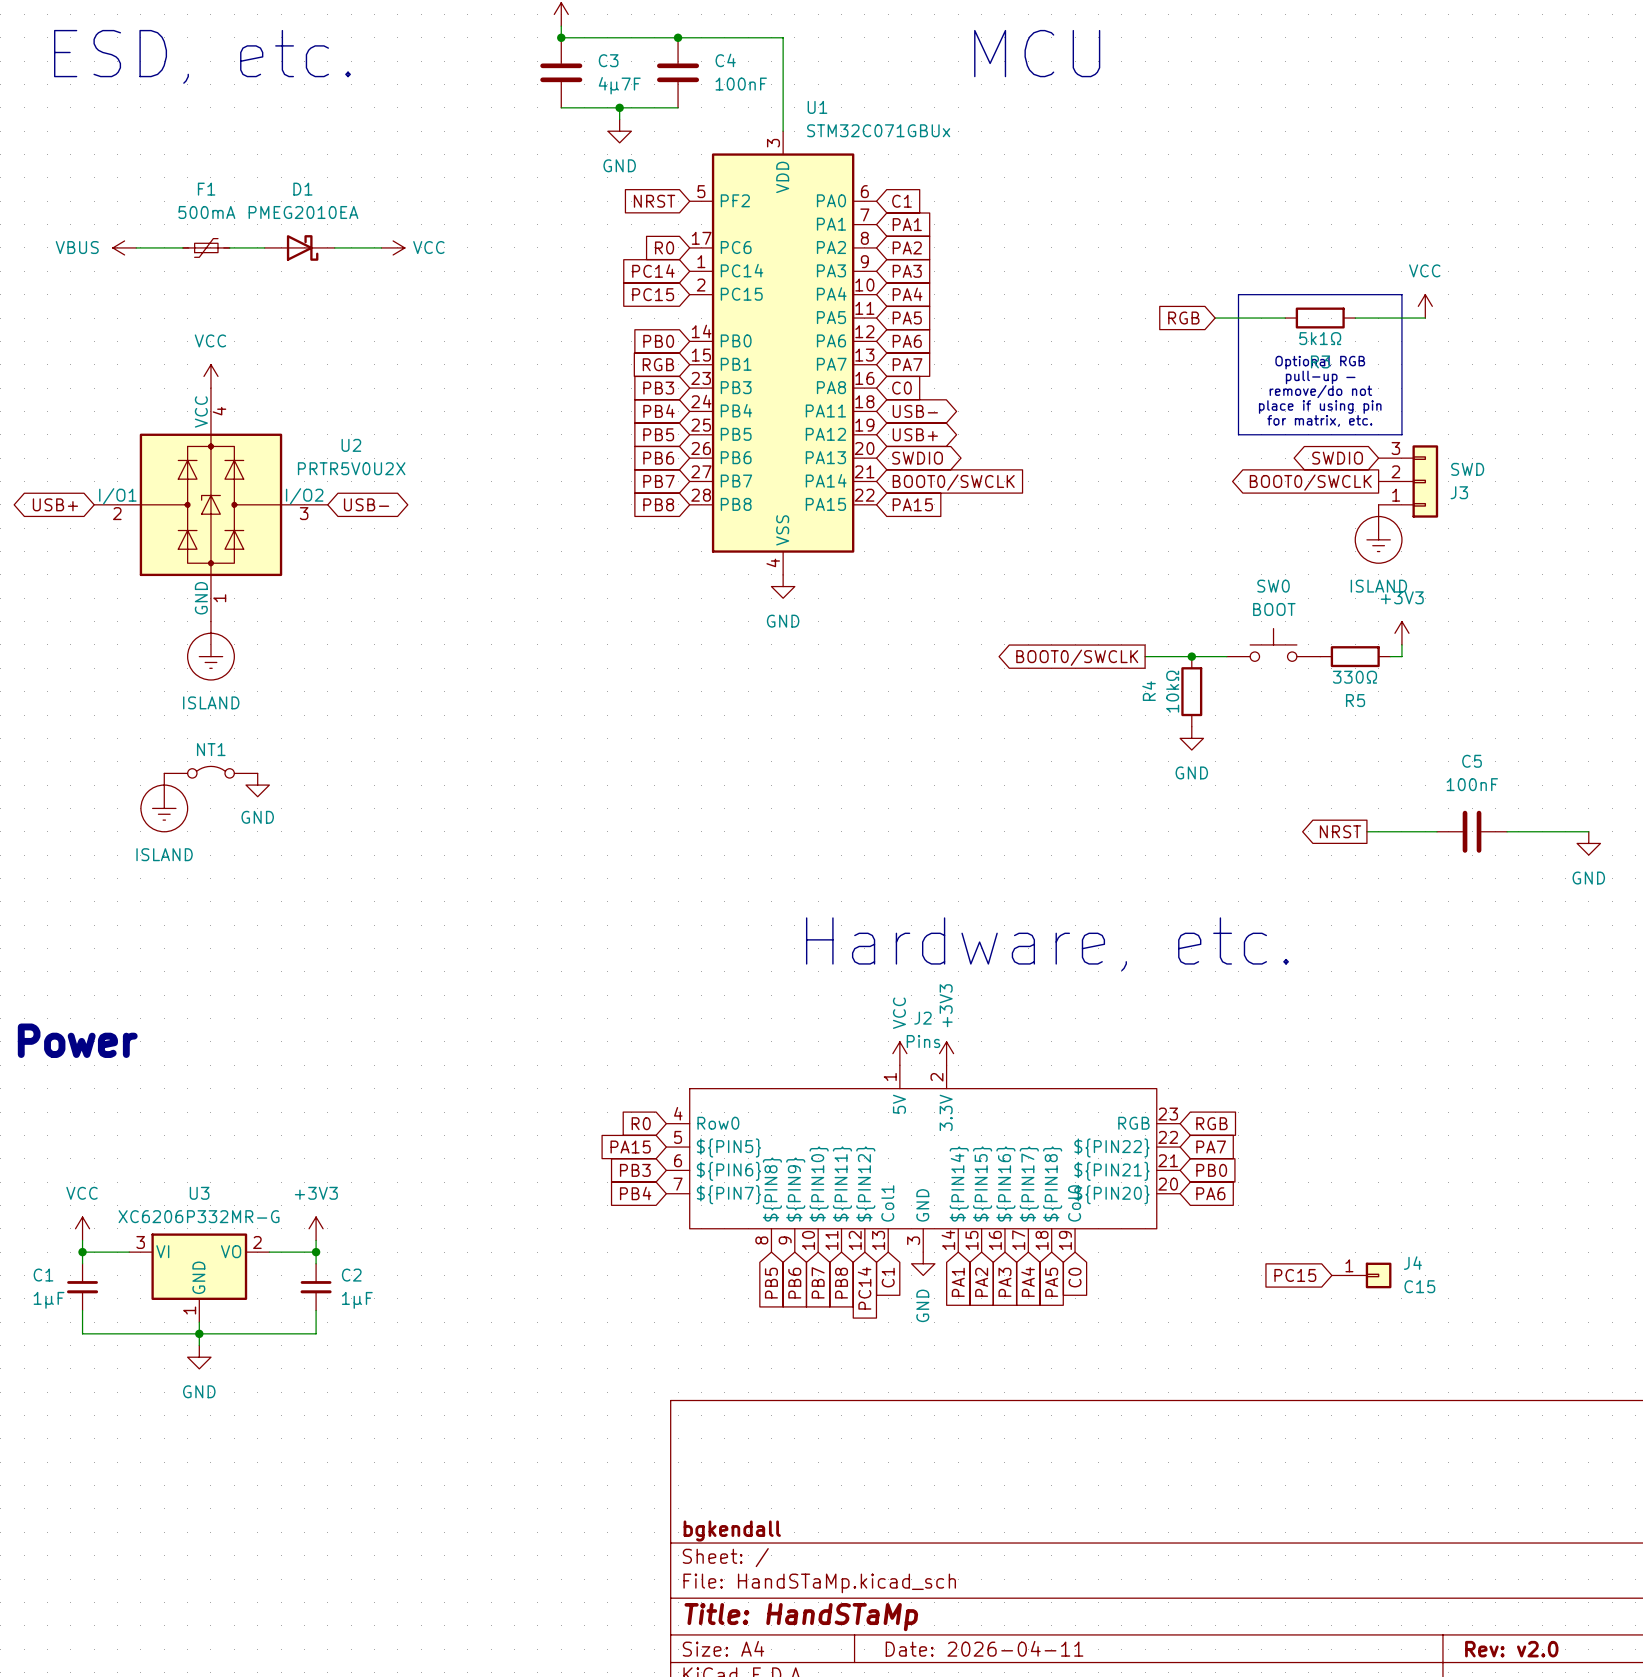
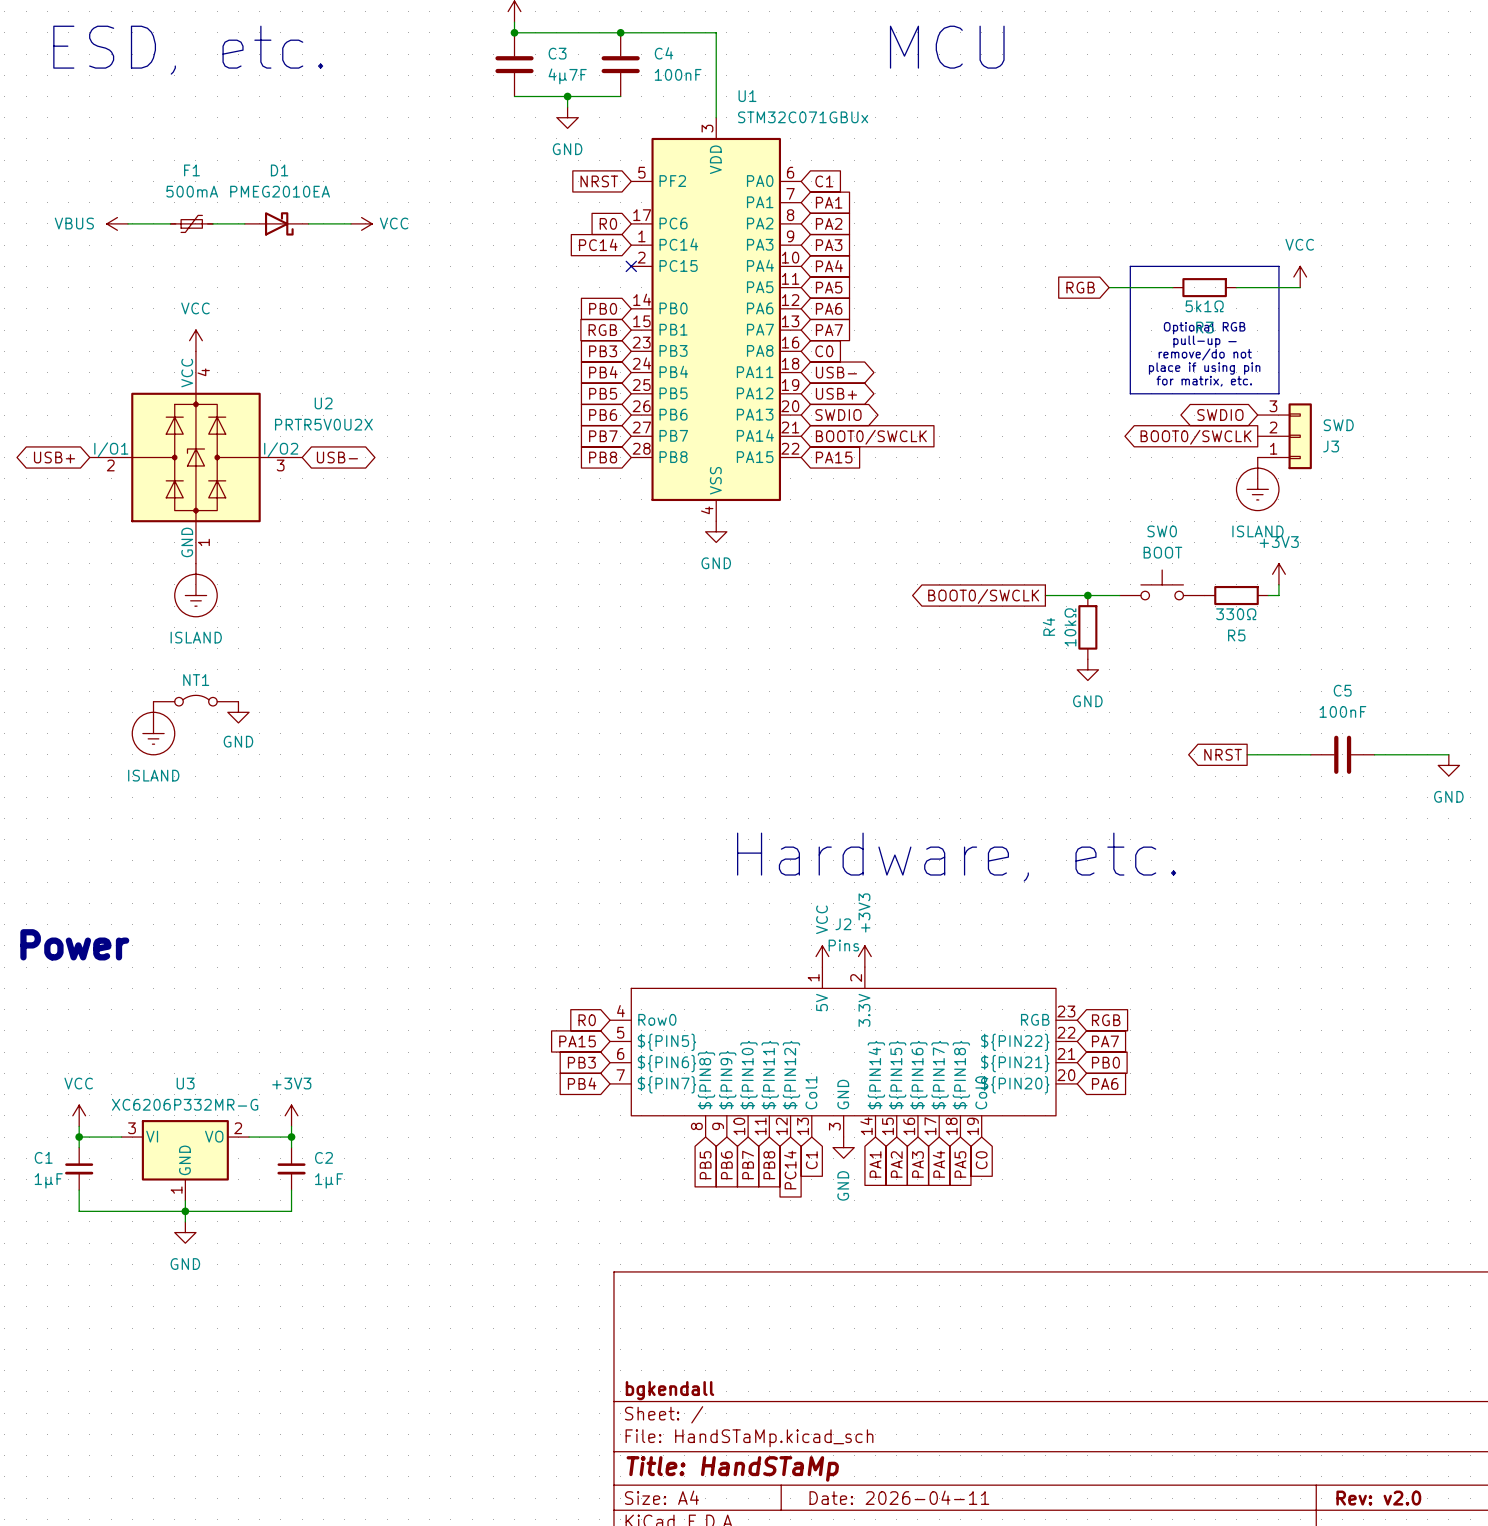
global label: PC15 (653, 294) -> none
no-connect mark: none -> (631, 266)
global label: PC15 (1295, 1275) -> none
J4: C15 (1361, 1275) -> none

